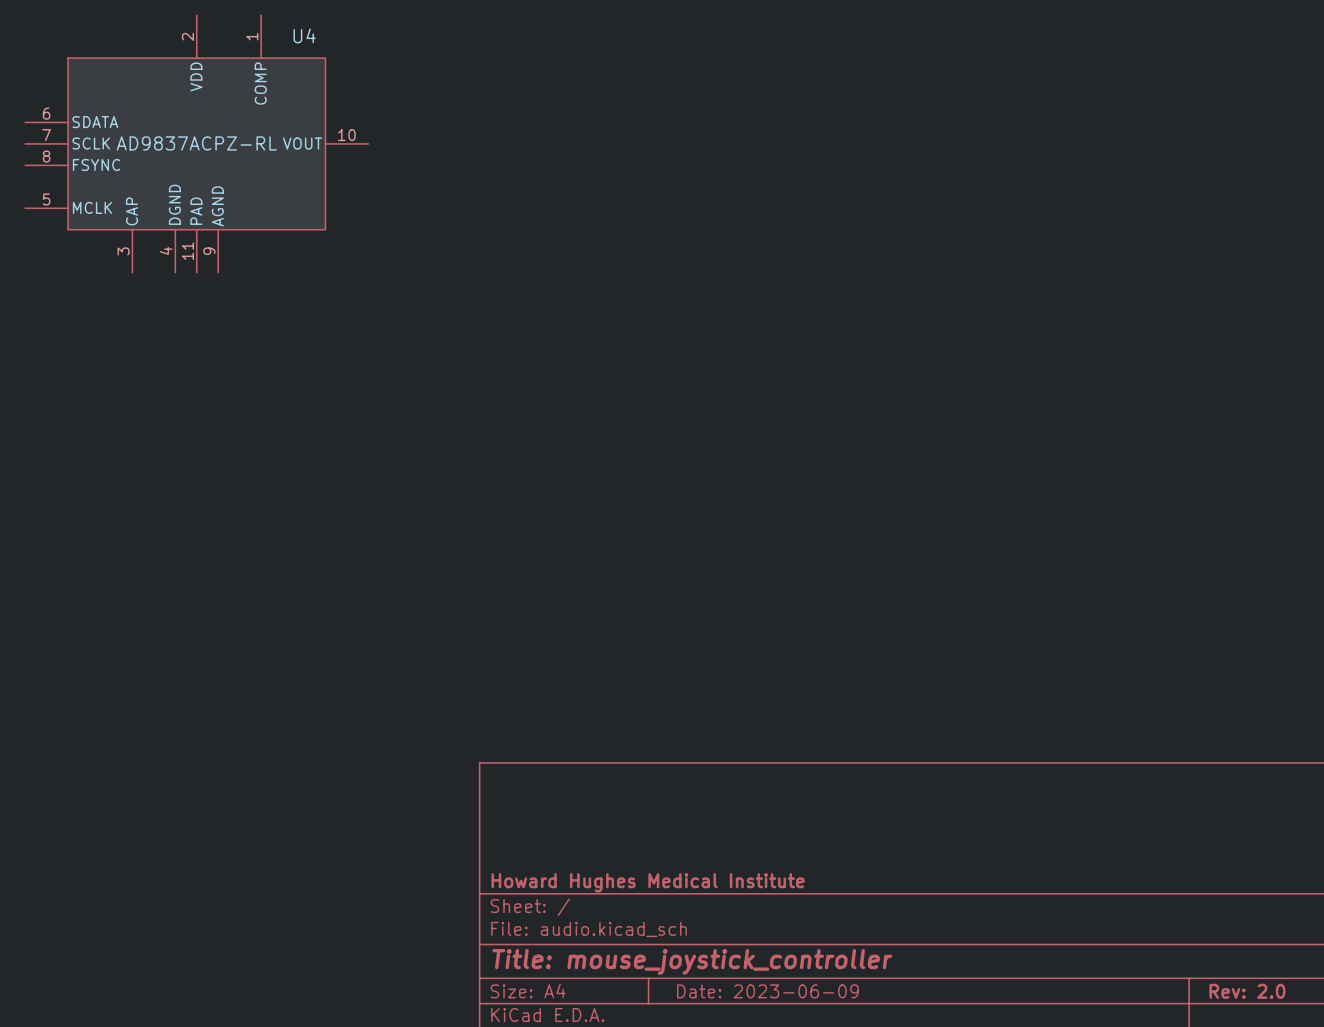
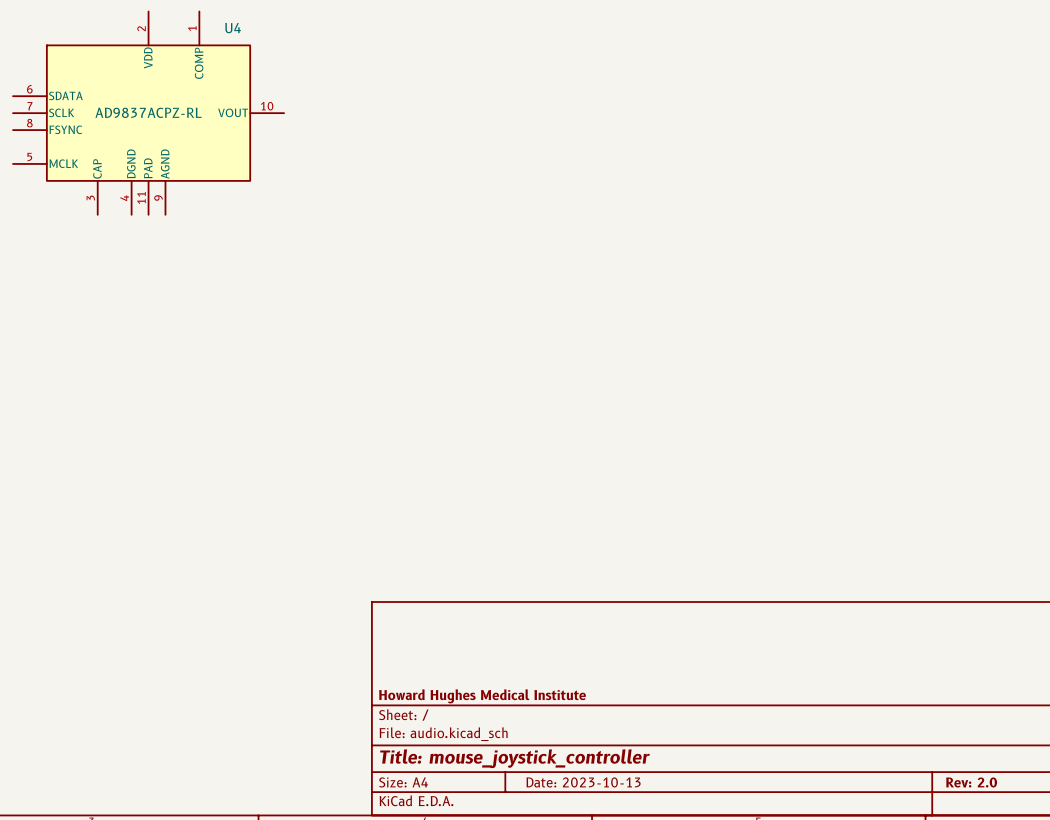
title block: Date: 2023-06-09 (767, 991) -> Date: 2023-10-13 (583, 782)

